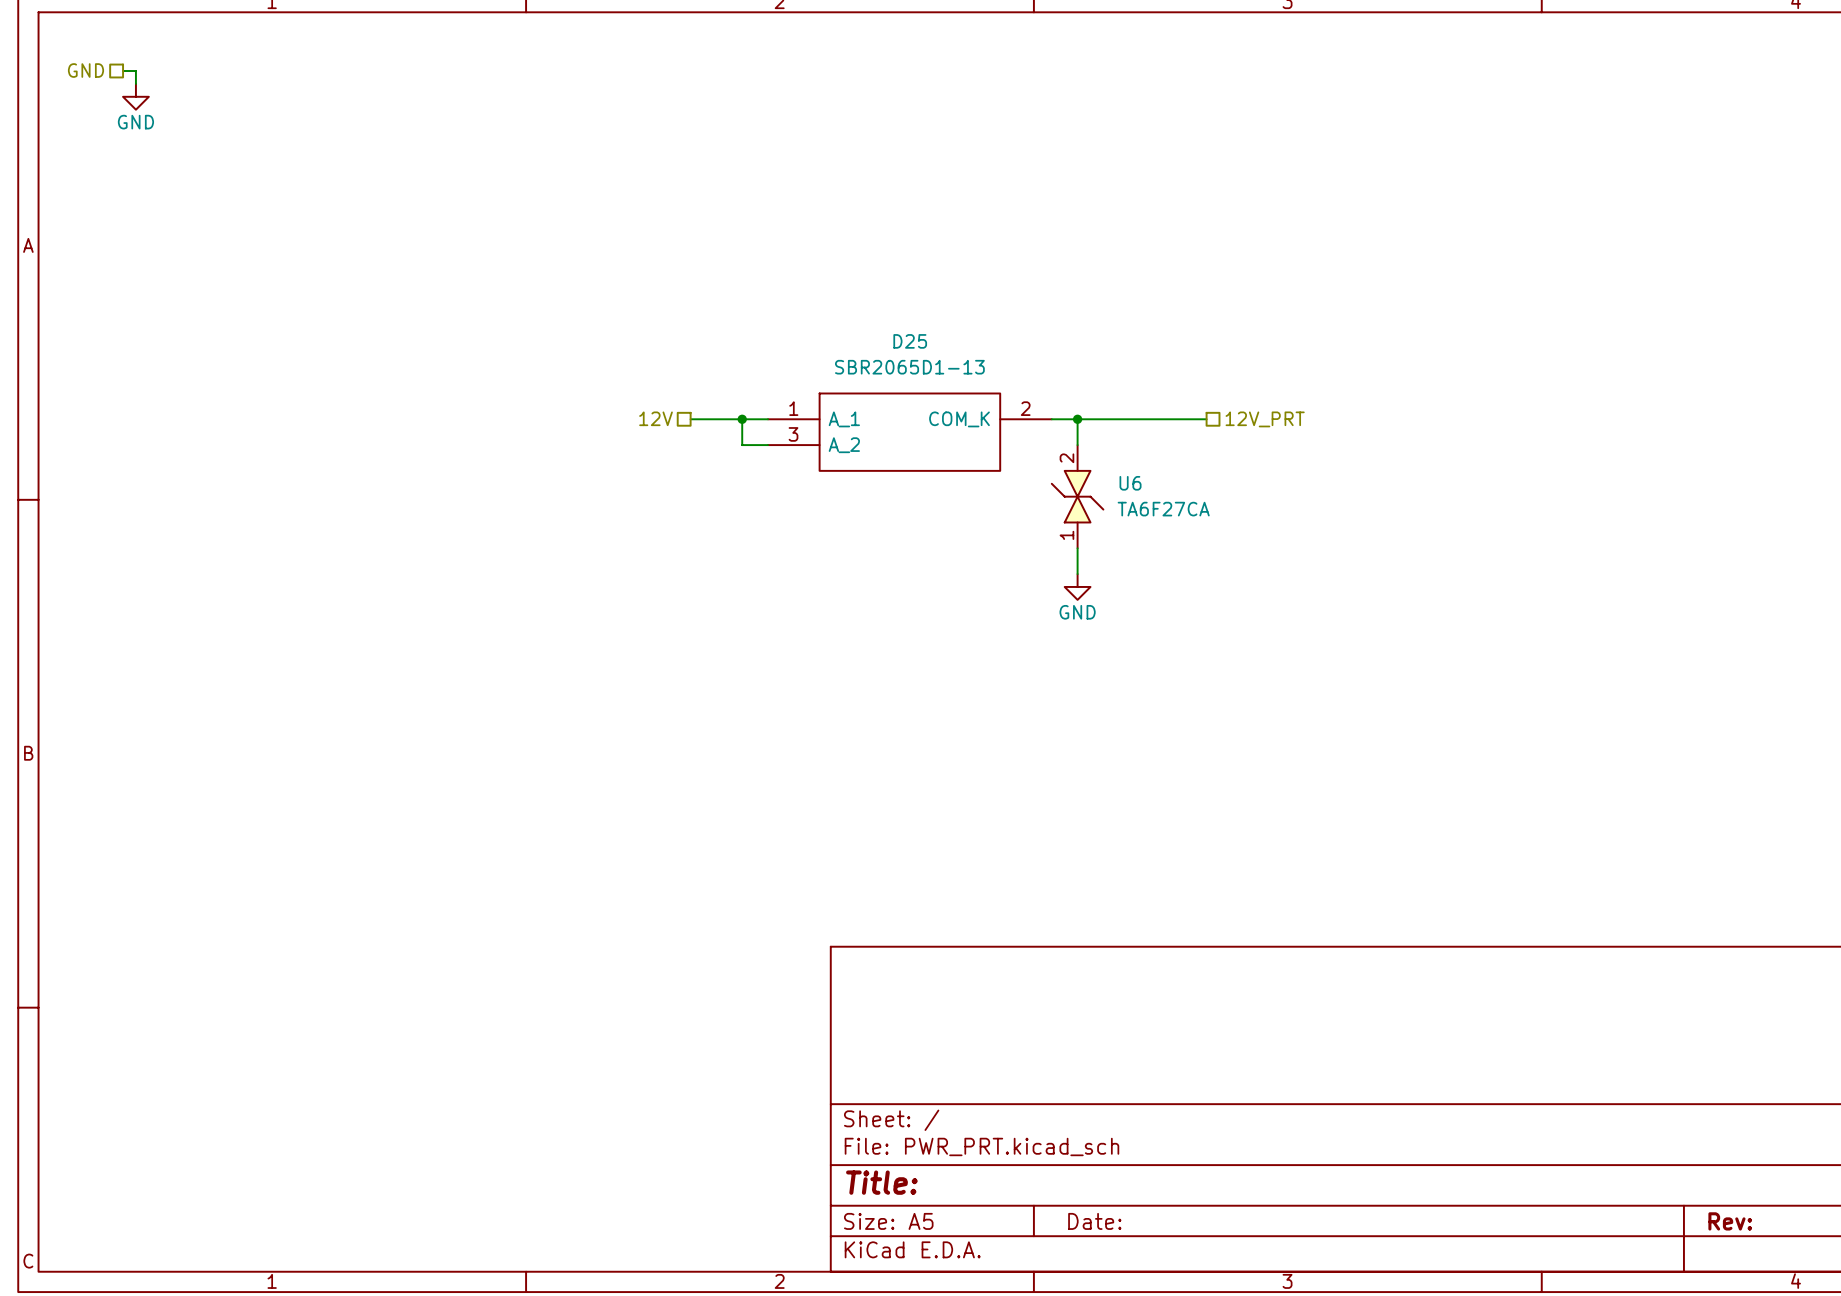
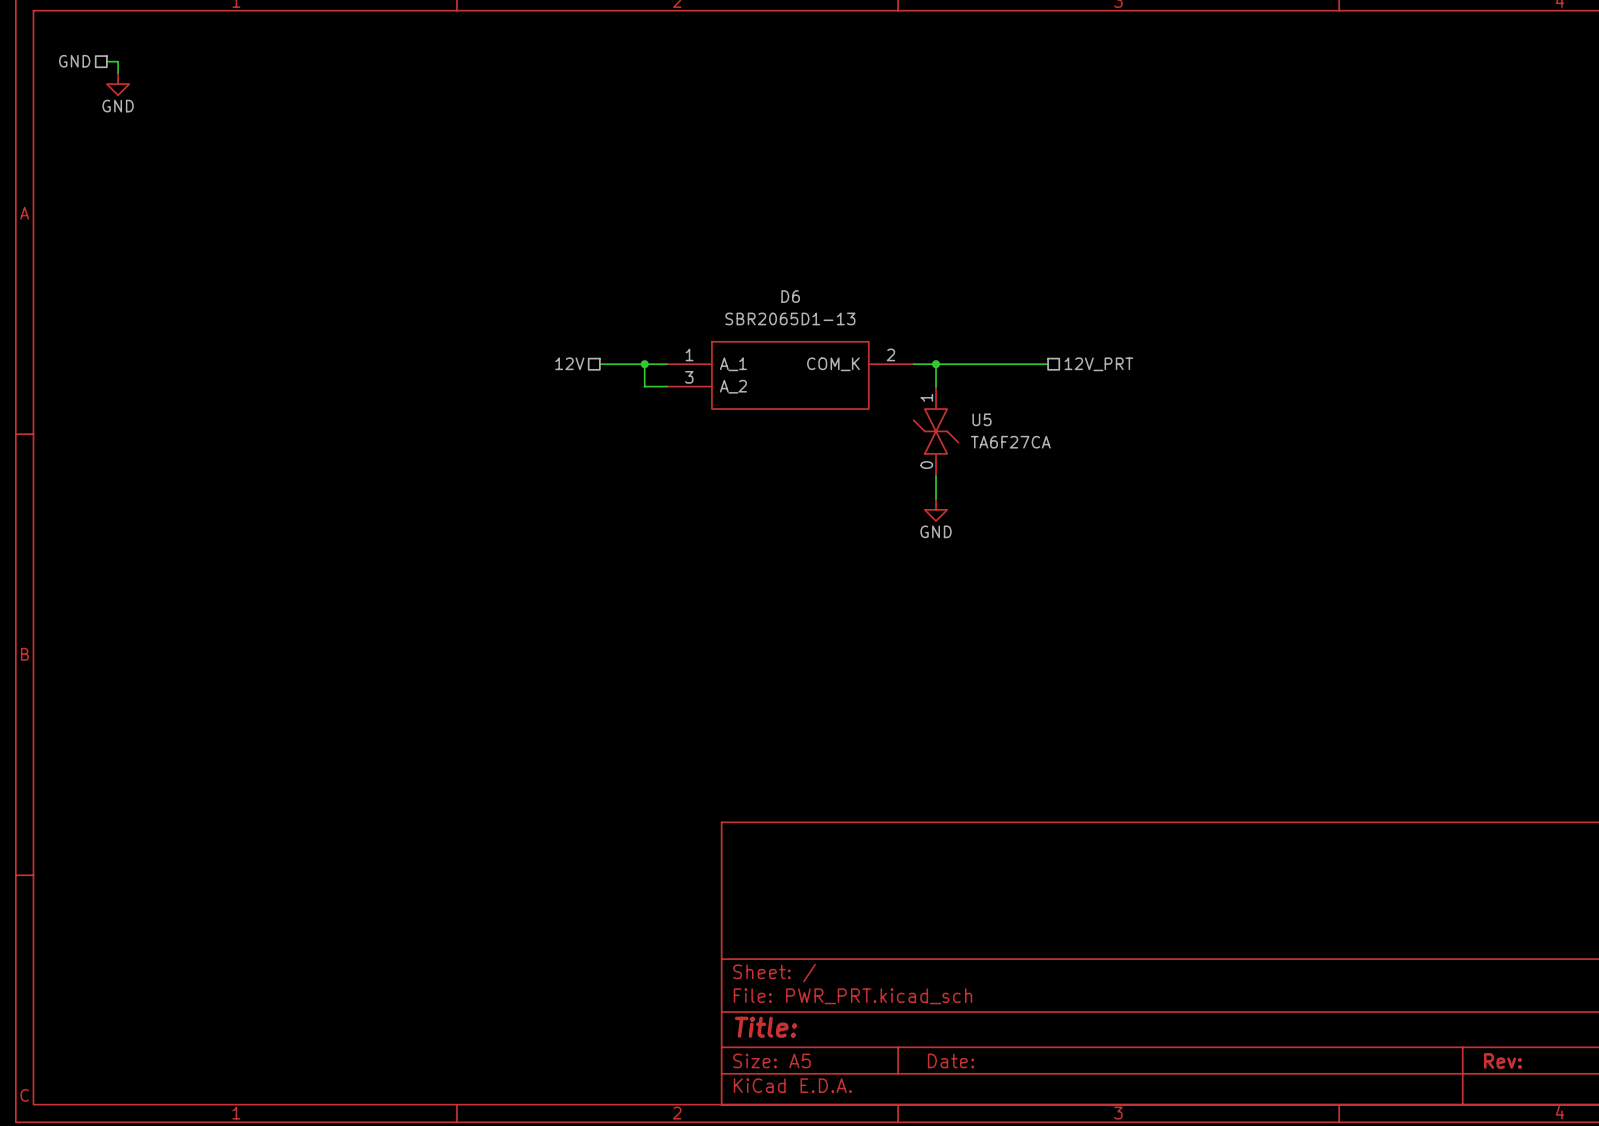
D25 name: D25 (910, 341) -> D6 (790, 296)
U6 pin number: 2 (1066, 458) -> 1 (926, 397)
U6 name: U6 (1130, 483) -> U5 (981, 419)
U6 pin number: 1 (1066, 535) -> 0 (926, 465)

